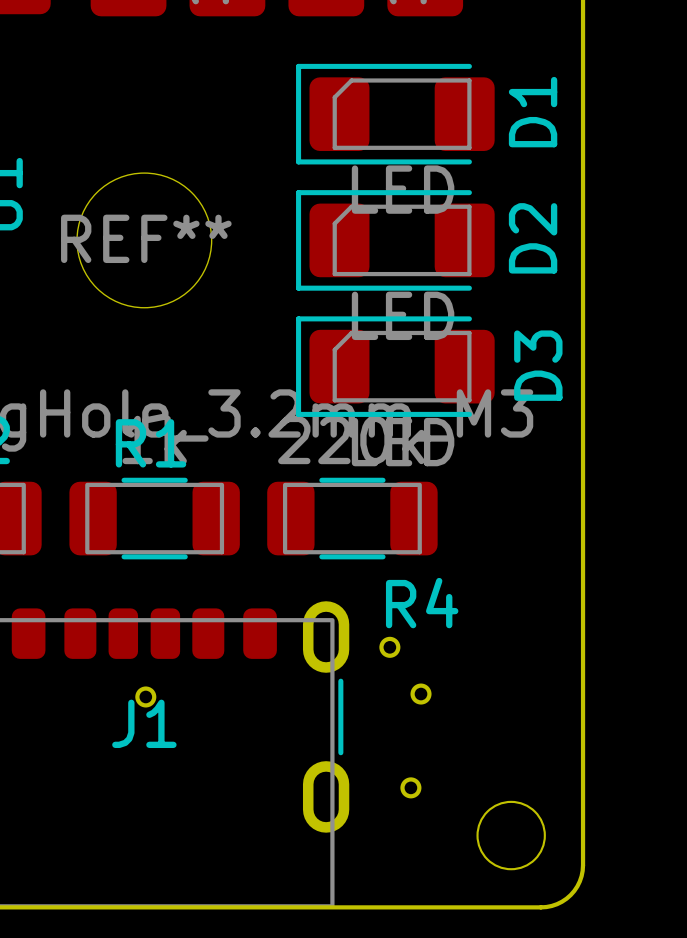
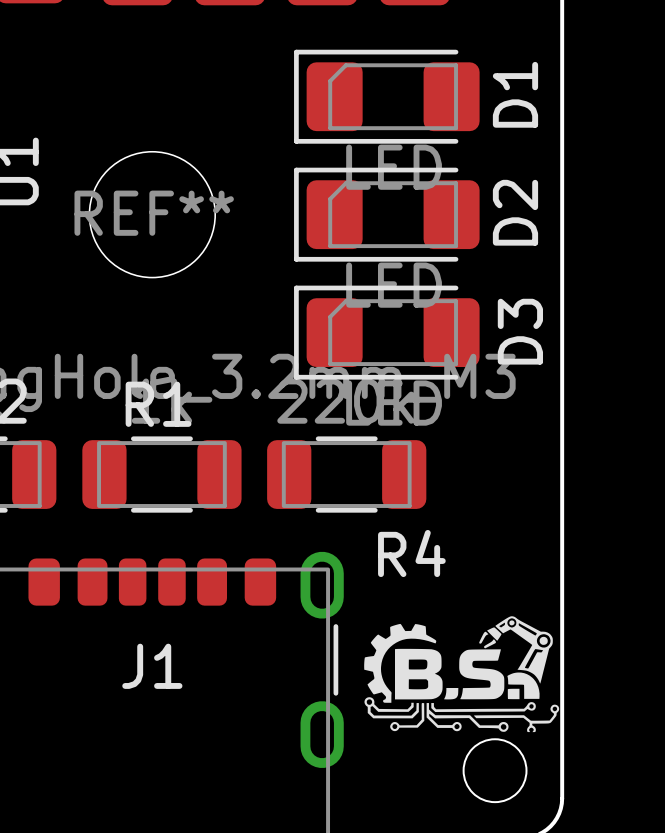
part: (389, 647) -> none
drawing: none -> [364, 616, 560, 733]
part: (421, 694) -> none
part: (145, 696) -> none
part: (410, 787) -> none

